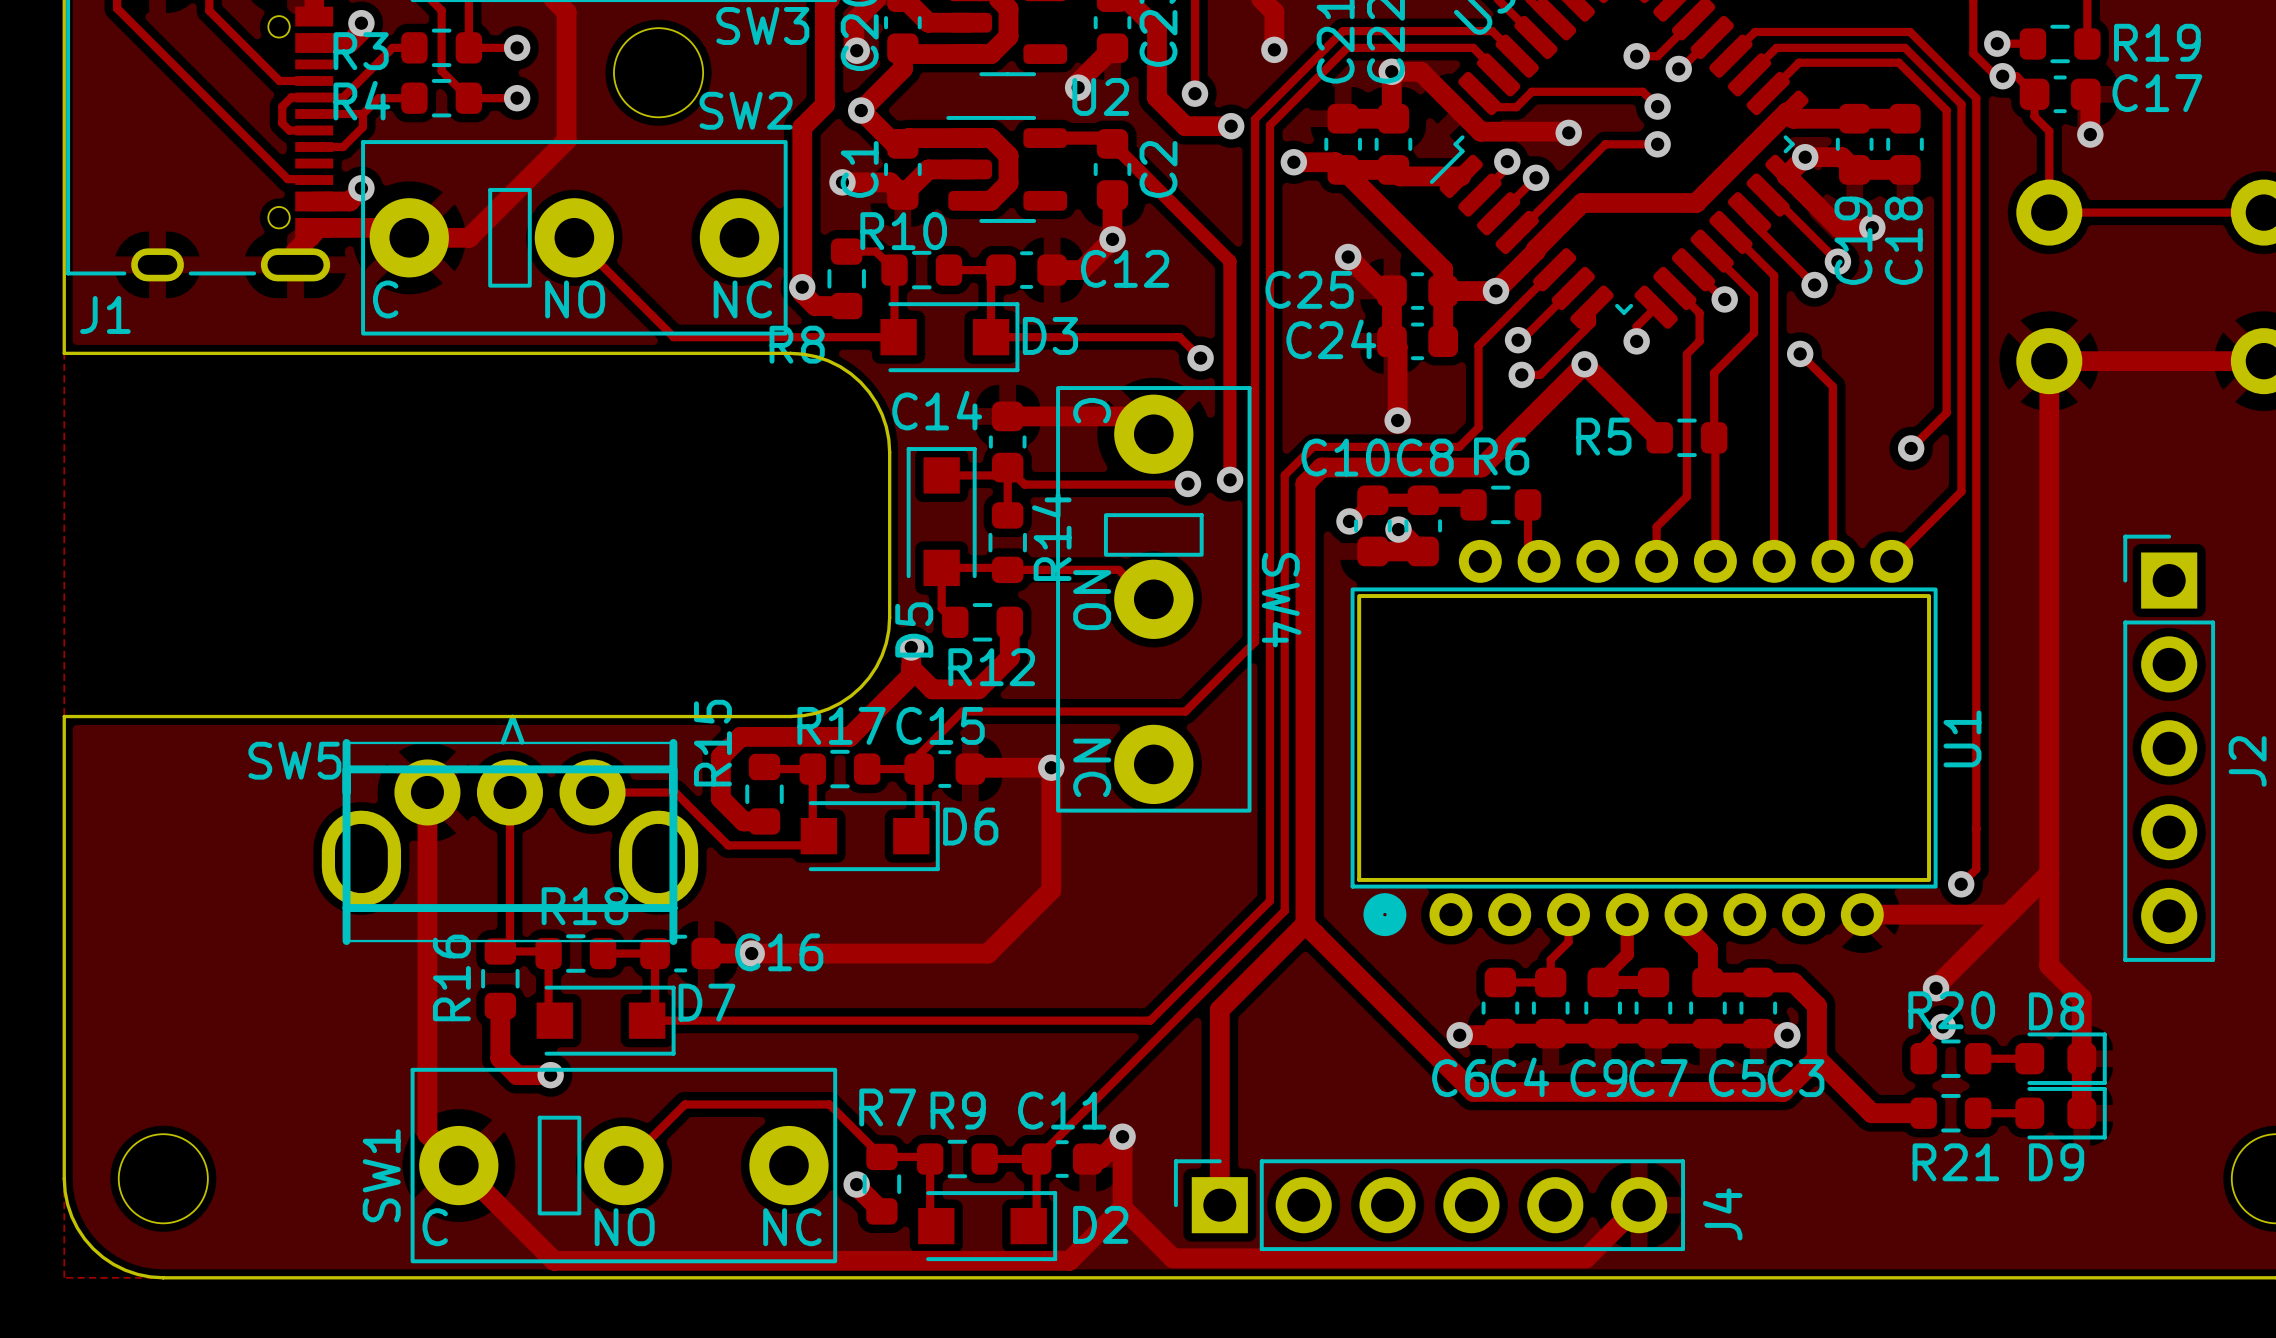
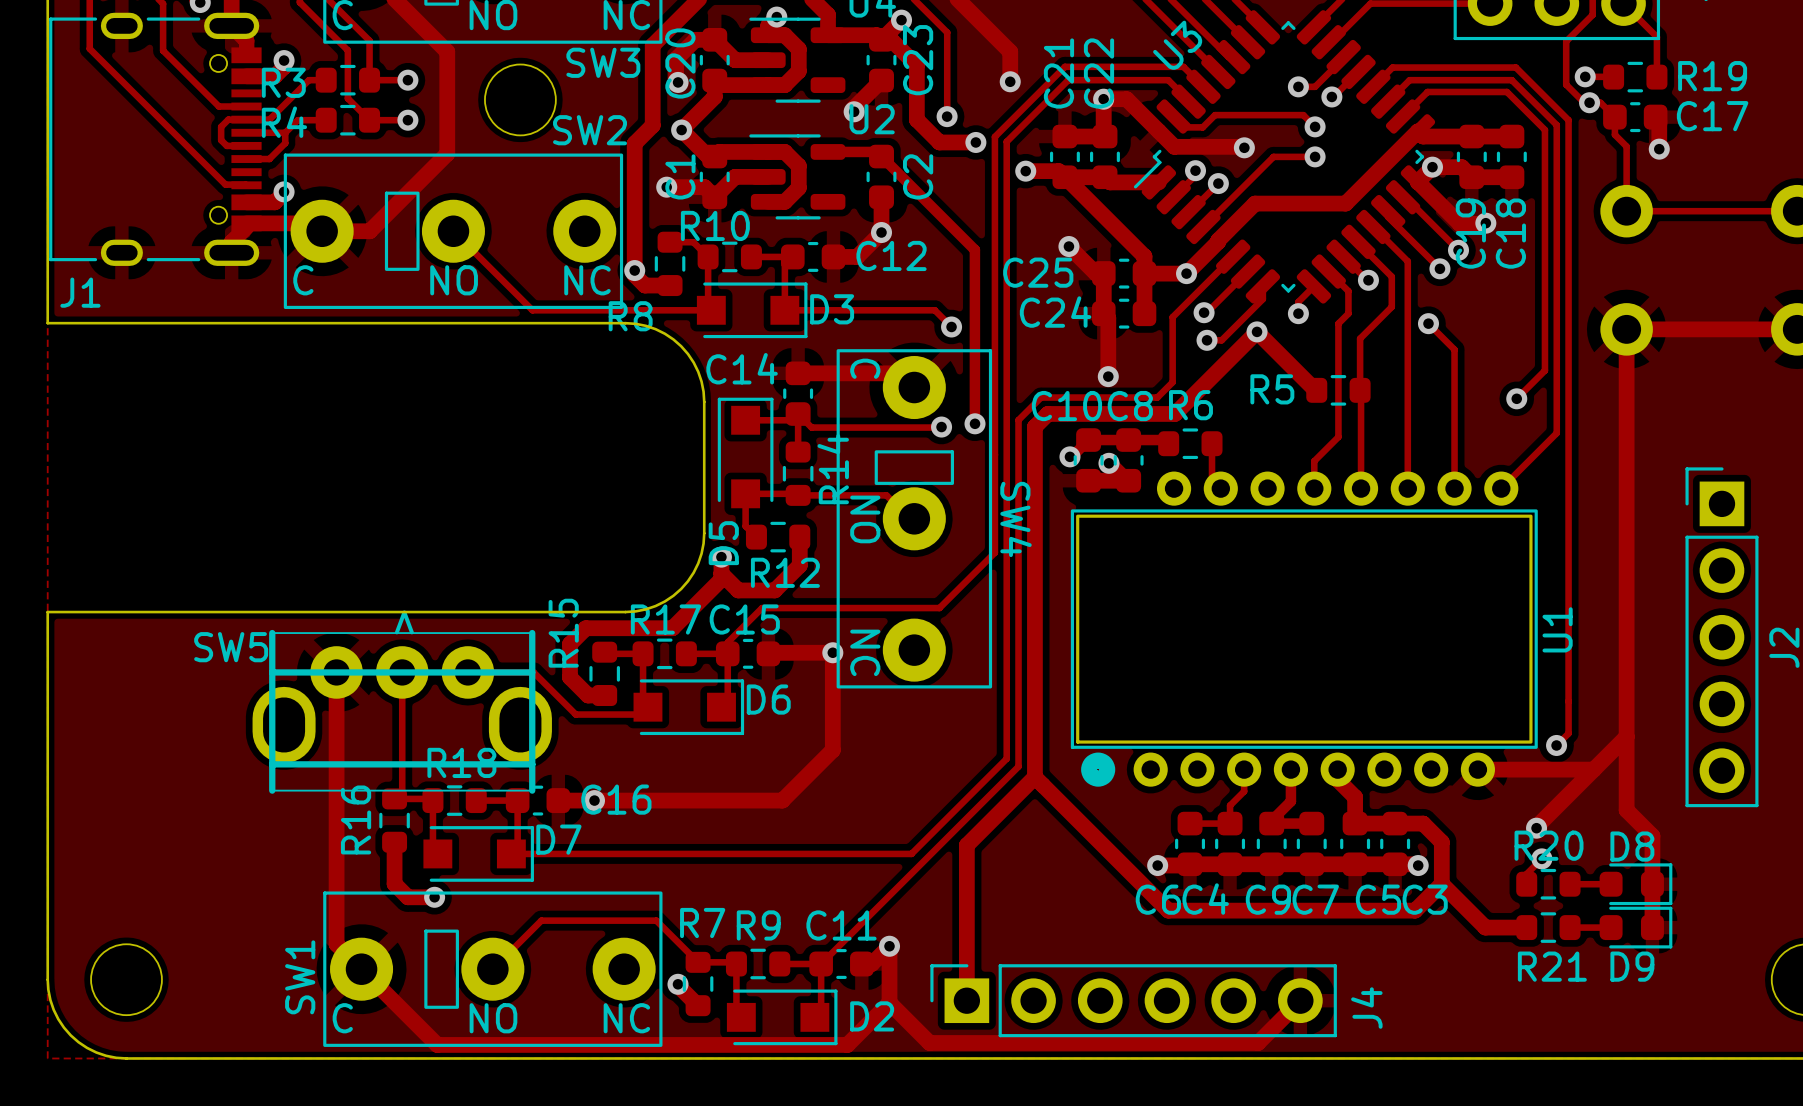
SW5 footprint: [321, 738, 699, 946] -> [252, 629, 552, 794]

